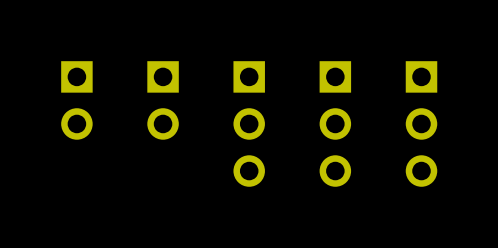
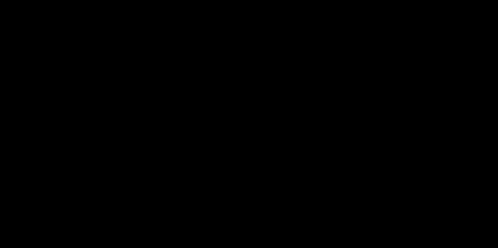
part: (76, 100) -> none
part: (163, 100) -> none
part: (249, 123) -> none
part: (335, 123) -> none
part: (421, 123) -> none

